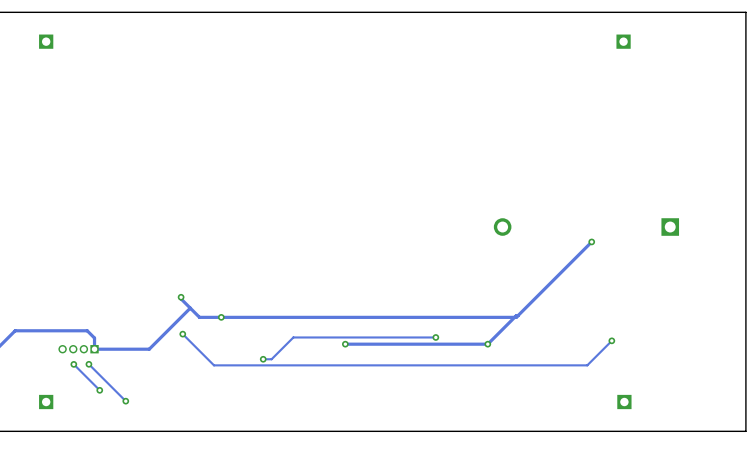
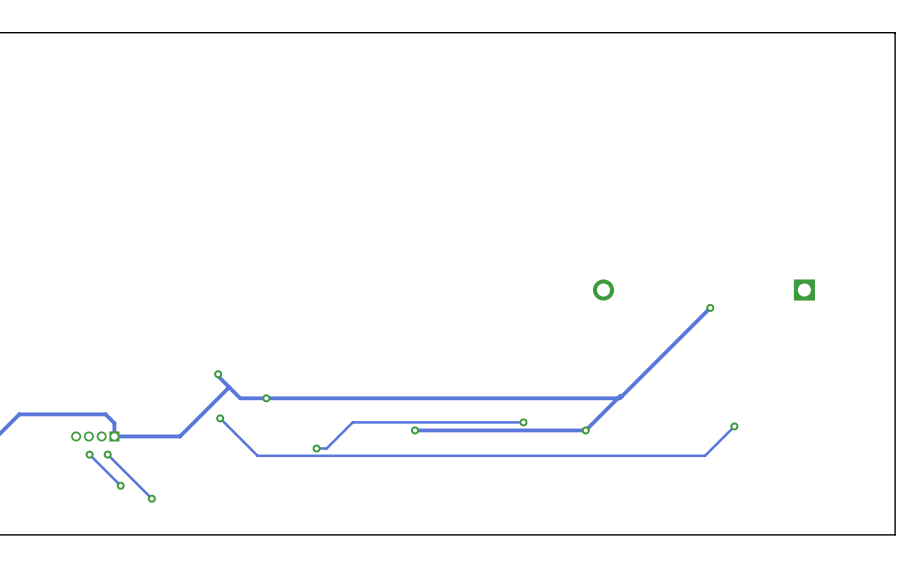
part: (46, 41) -> none
part: (623, 41) -> none
part: (46, 402) -> none
part: (624, 402) -> none

